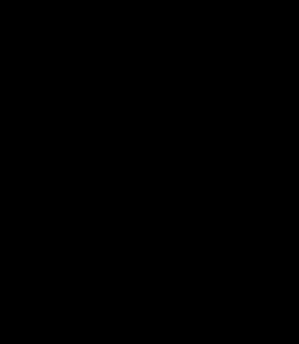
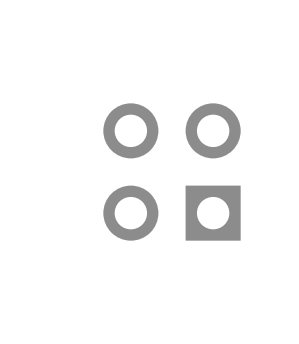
part: none -> (172, 172)

